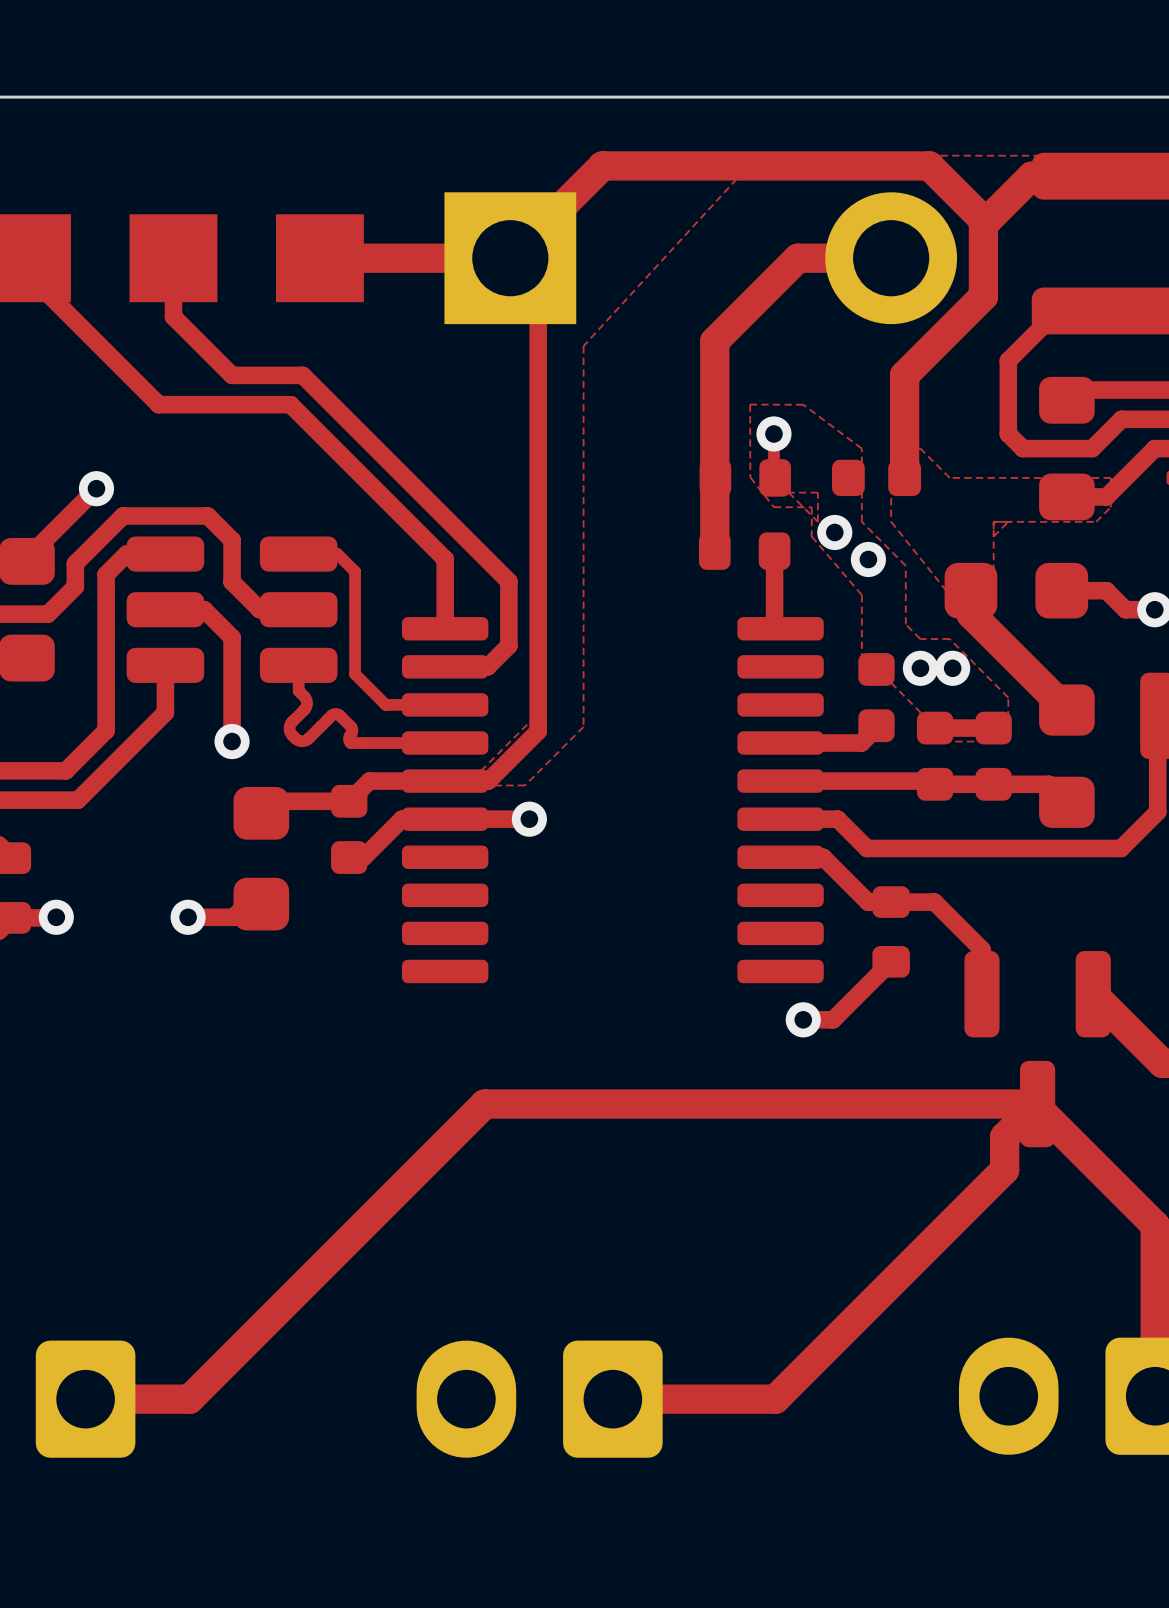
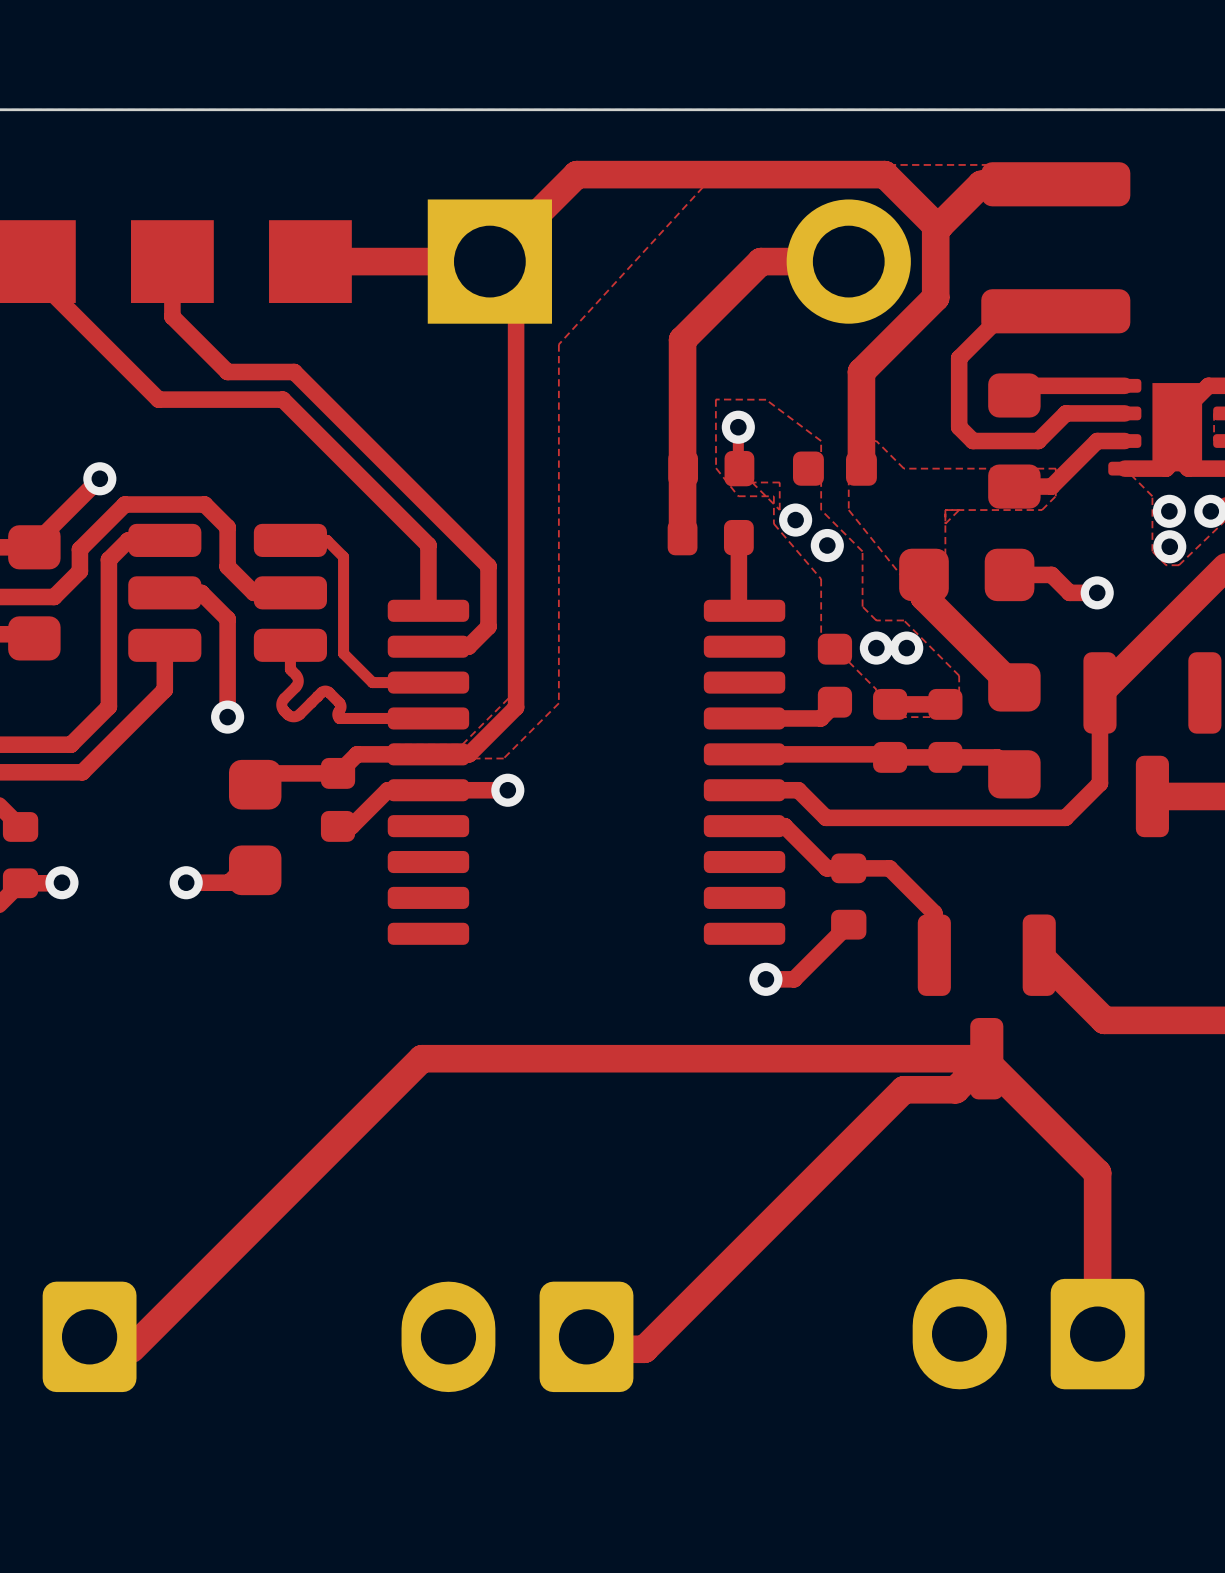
top track: (484, 1104) (189, 1399) (85, 1399) -> (465, 1058) (421, 1058) (131, 1349)
top track: (1004, 1137) (1004, 1169) (775, 1399) (612, 1399) -> (955, 1089) (903, 1089) (644, 1349) (628, 1349)

